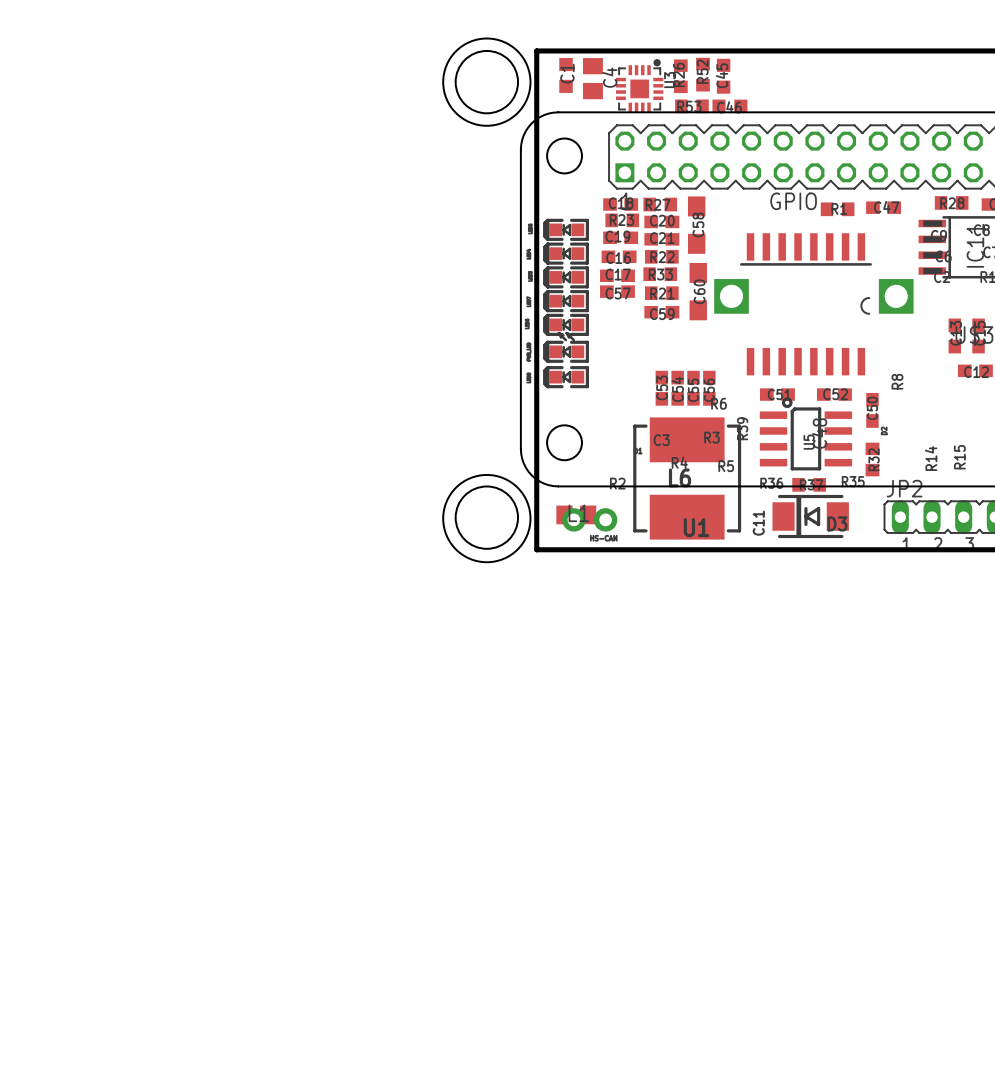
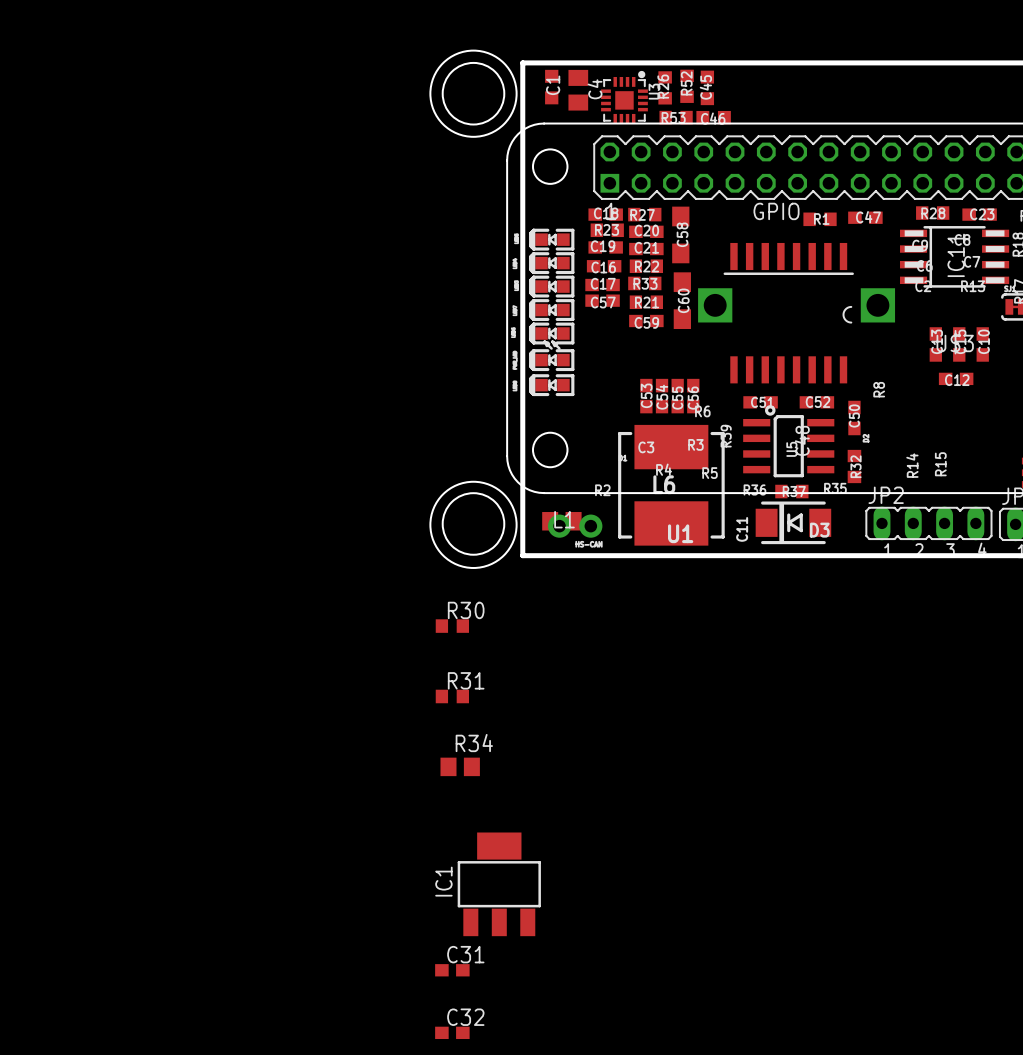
R30: none -> (452, 626)
R31: none -> (452, 696)
R34: none -> (460, 766)
IC1: none -> (499, 884)
C31: none -> (452, 970)
C32: none -> (452, 1032)

